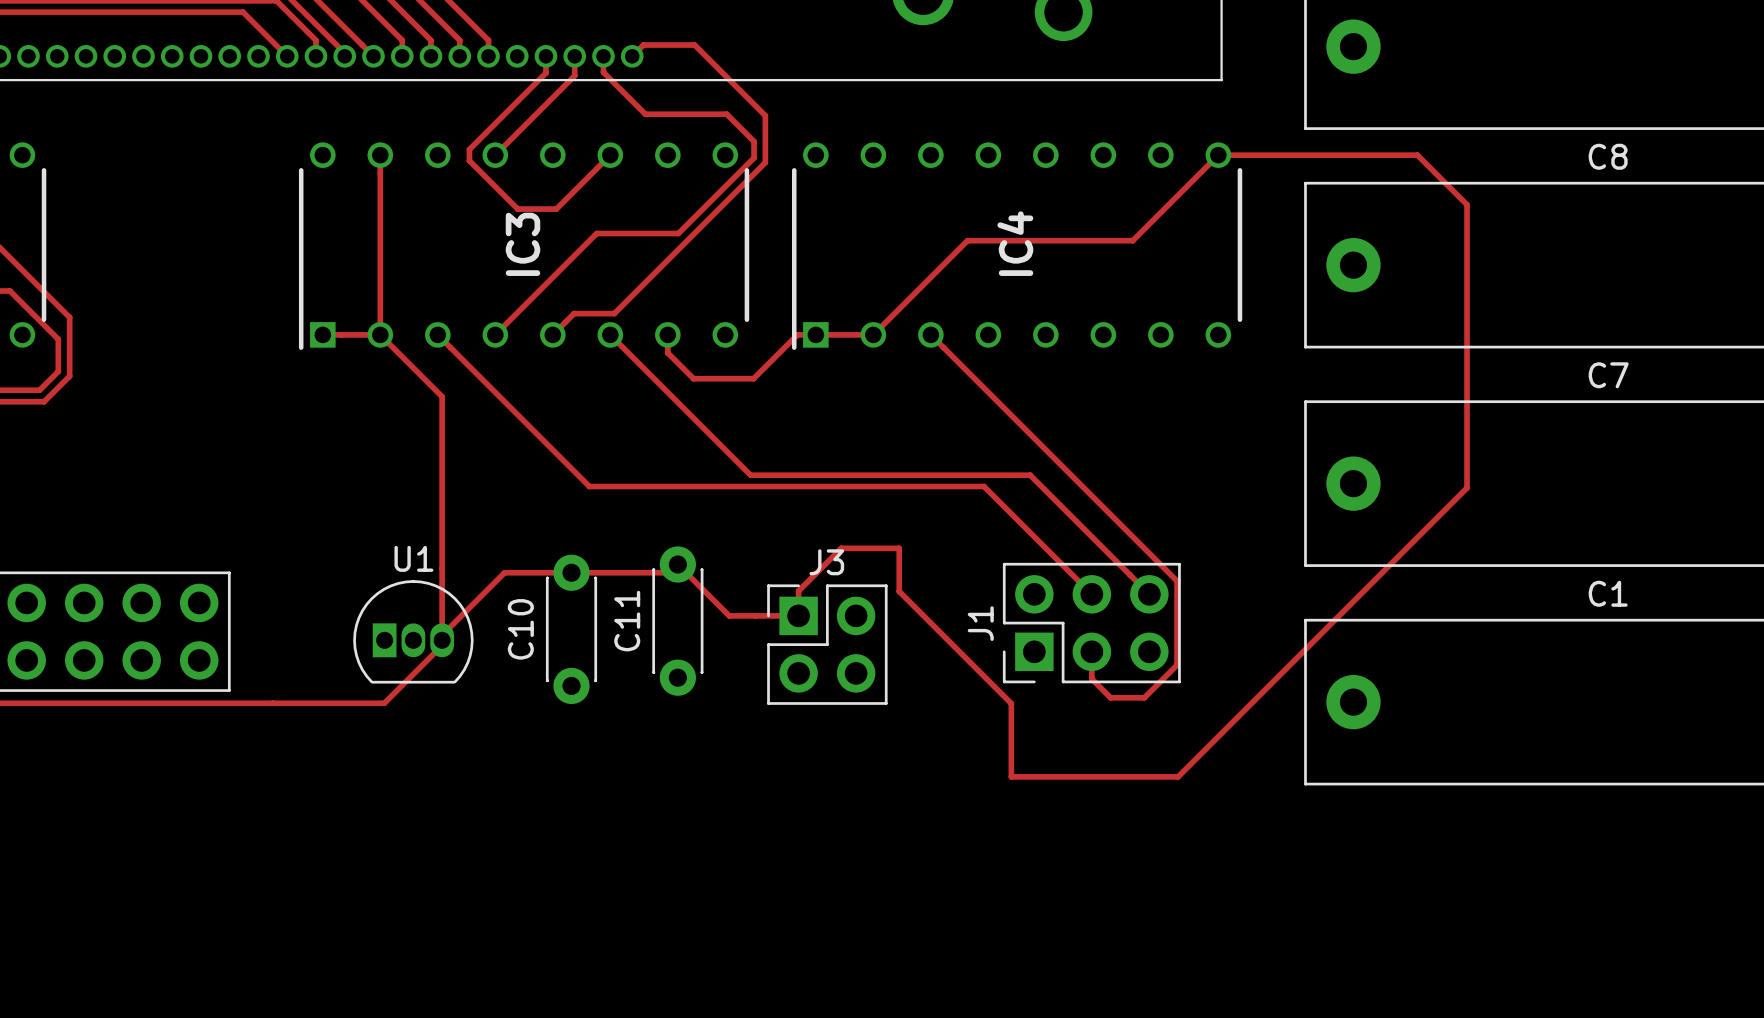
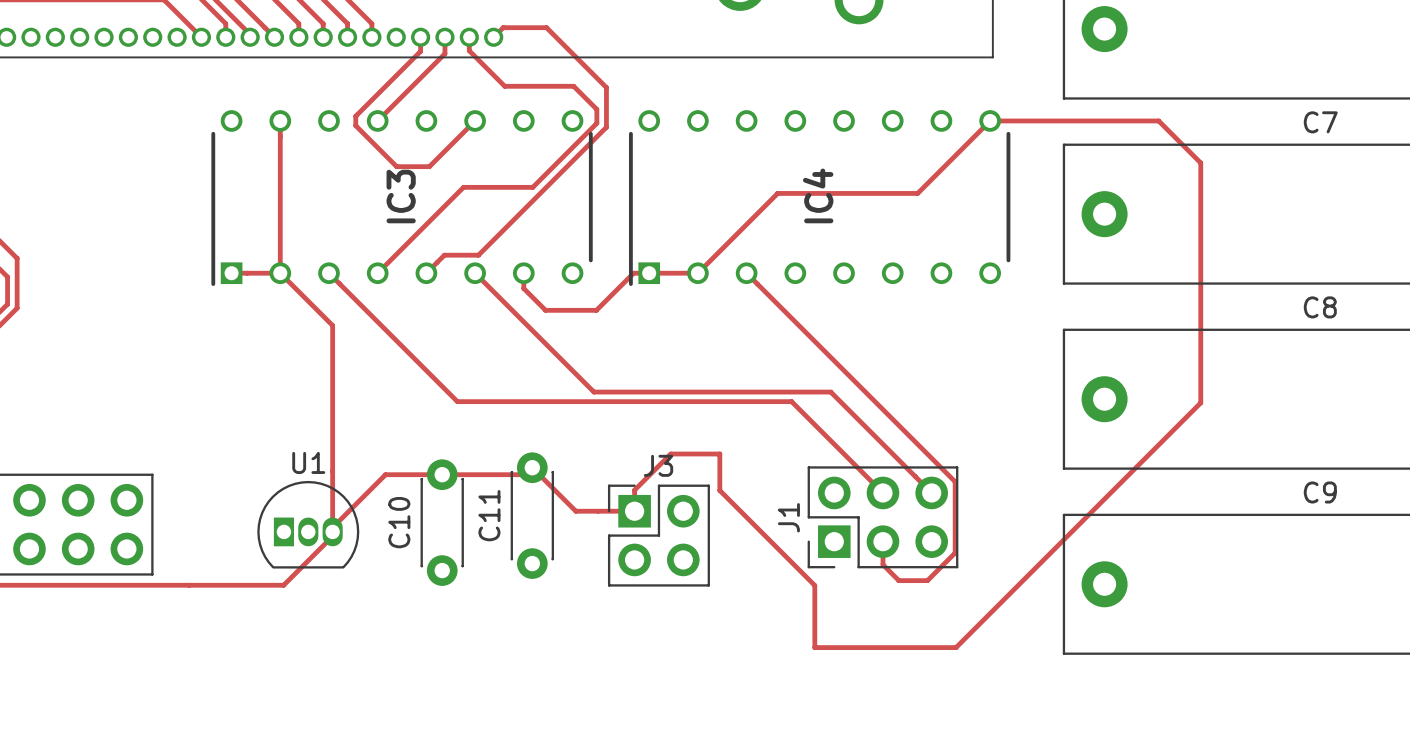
C8 name: C8 (1608, 156) -> C7 (1320, 122)
C7 name: C7 (1608, 375) -> C8 (1320, 307)
C1 name: C1 (1608, 593) -> C9 (1320, 492)

